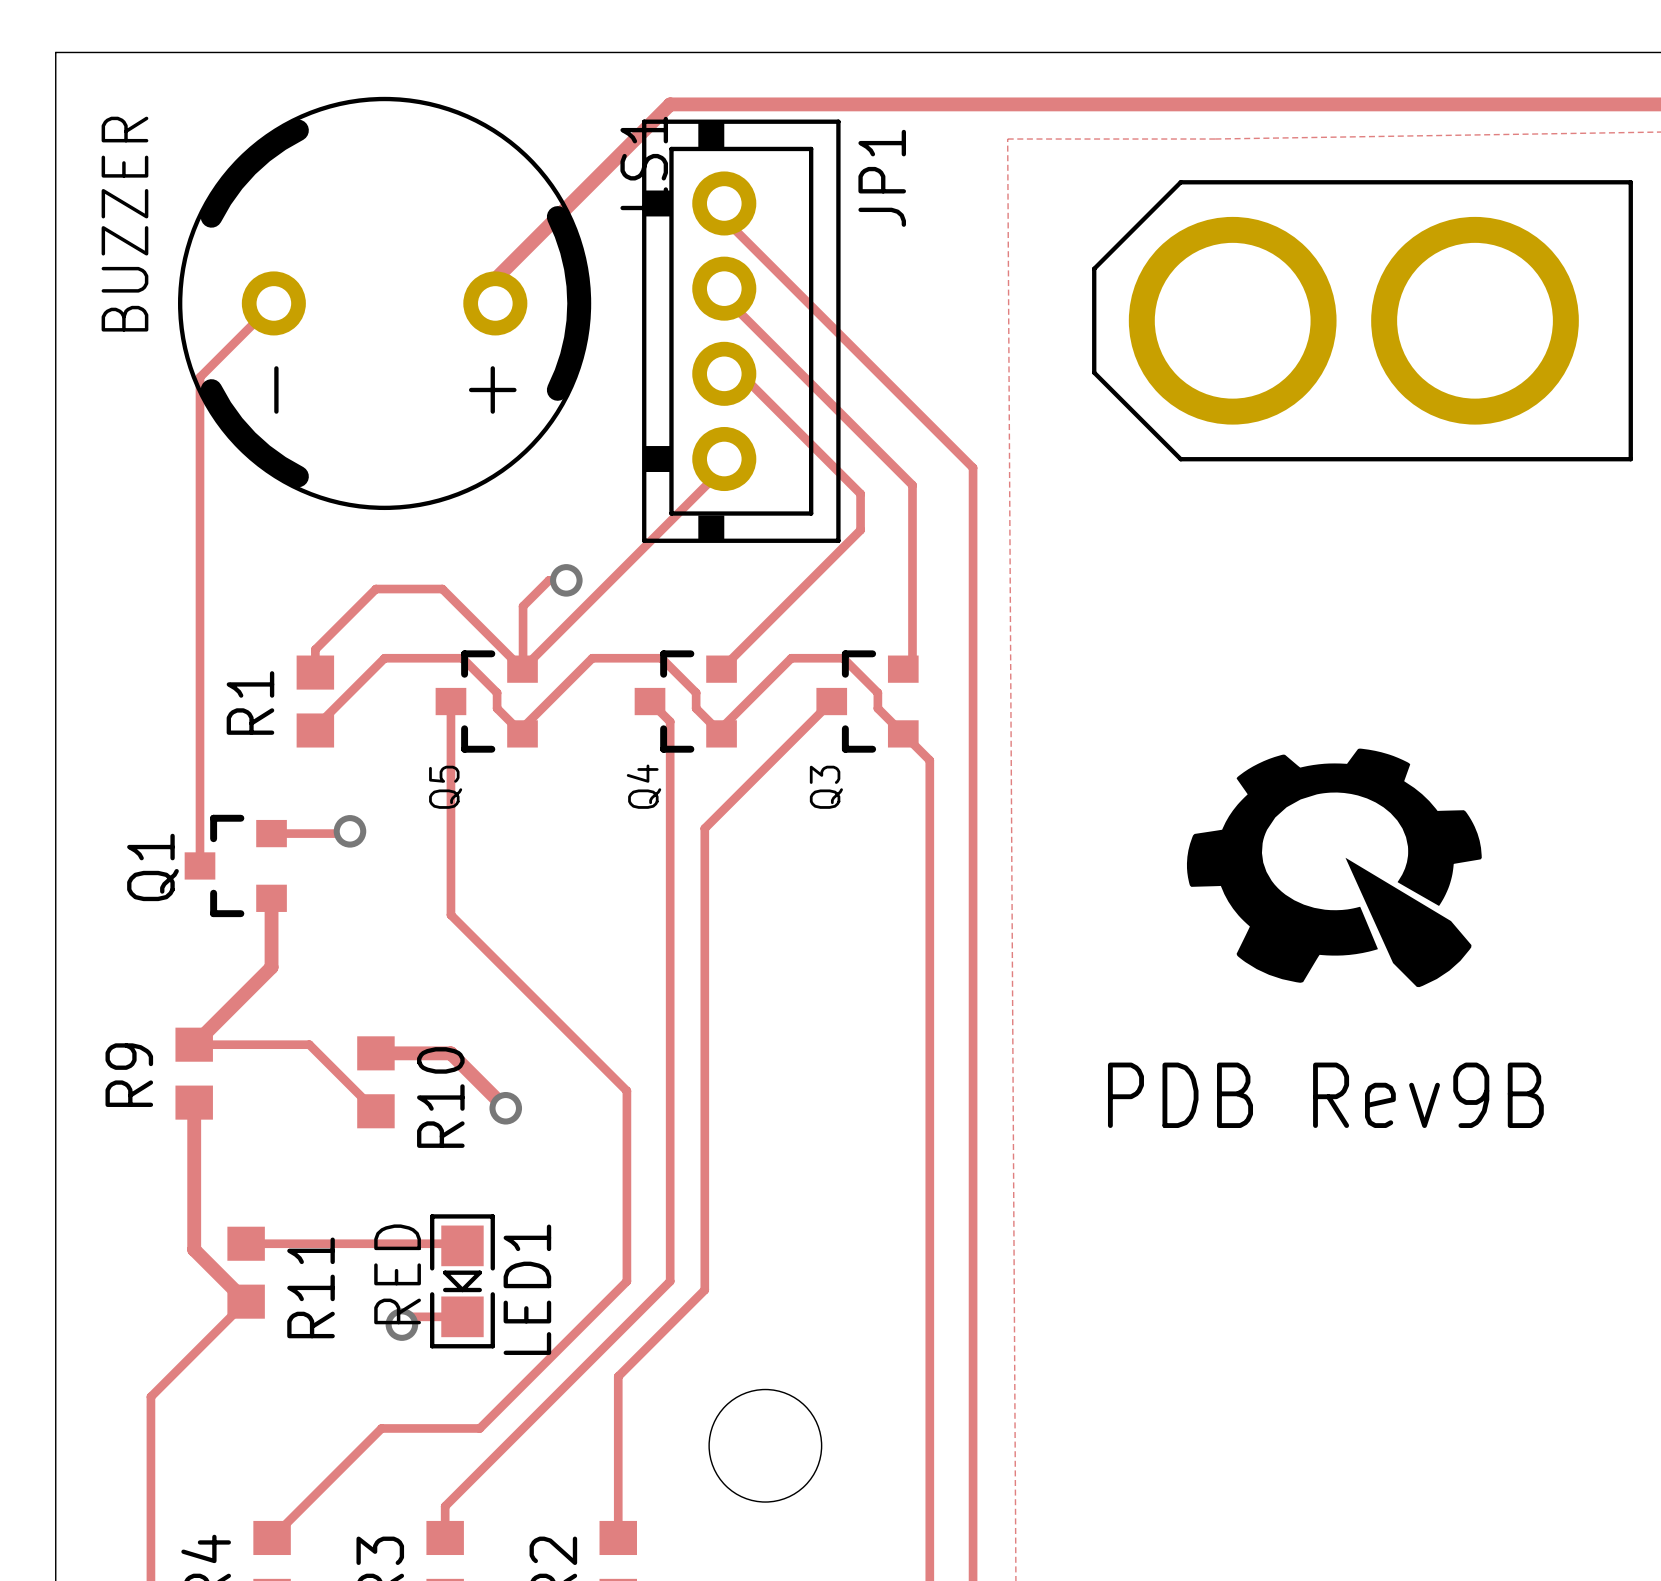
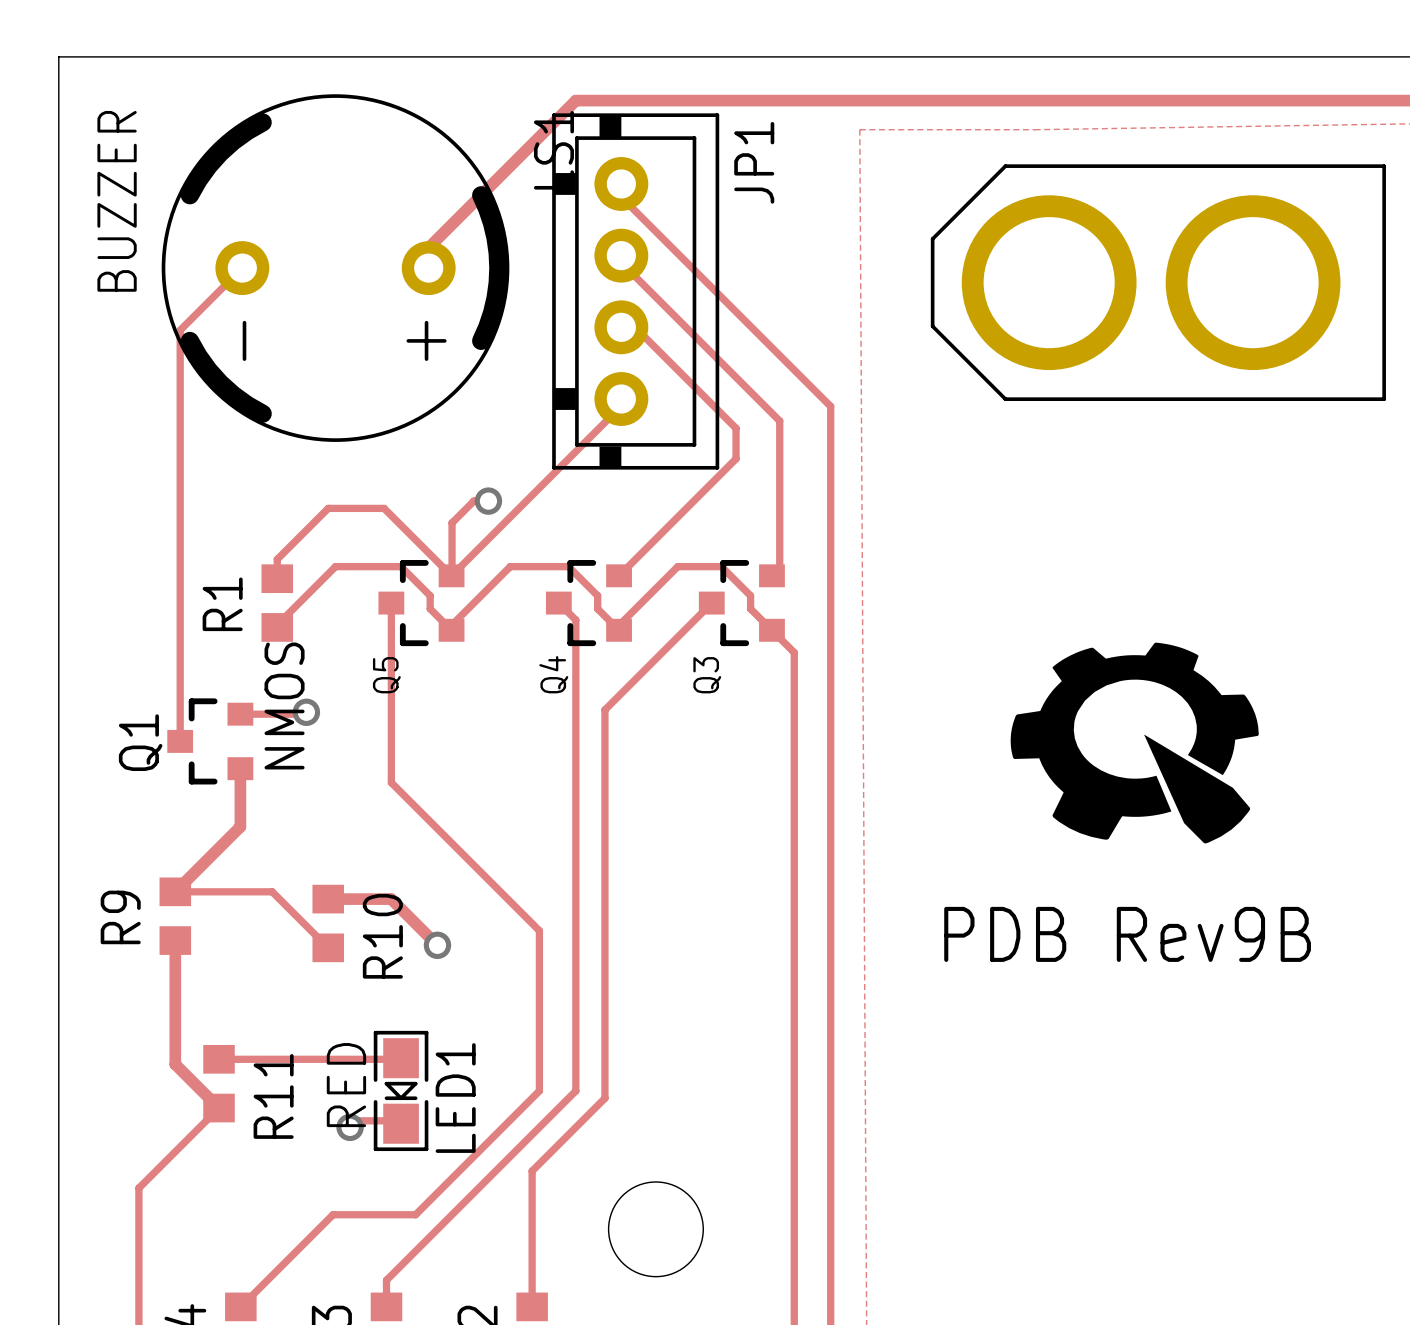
Q1 value: none -> NMOS (284, 706)
LED1 footprint: [430, 1214, 495, 1349] -> [373, 1030, 429, 1152]

